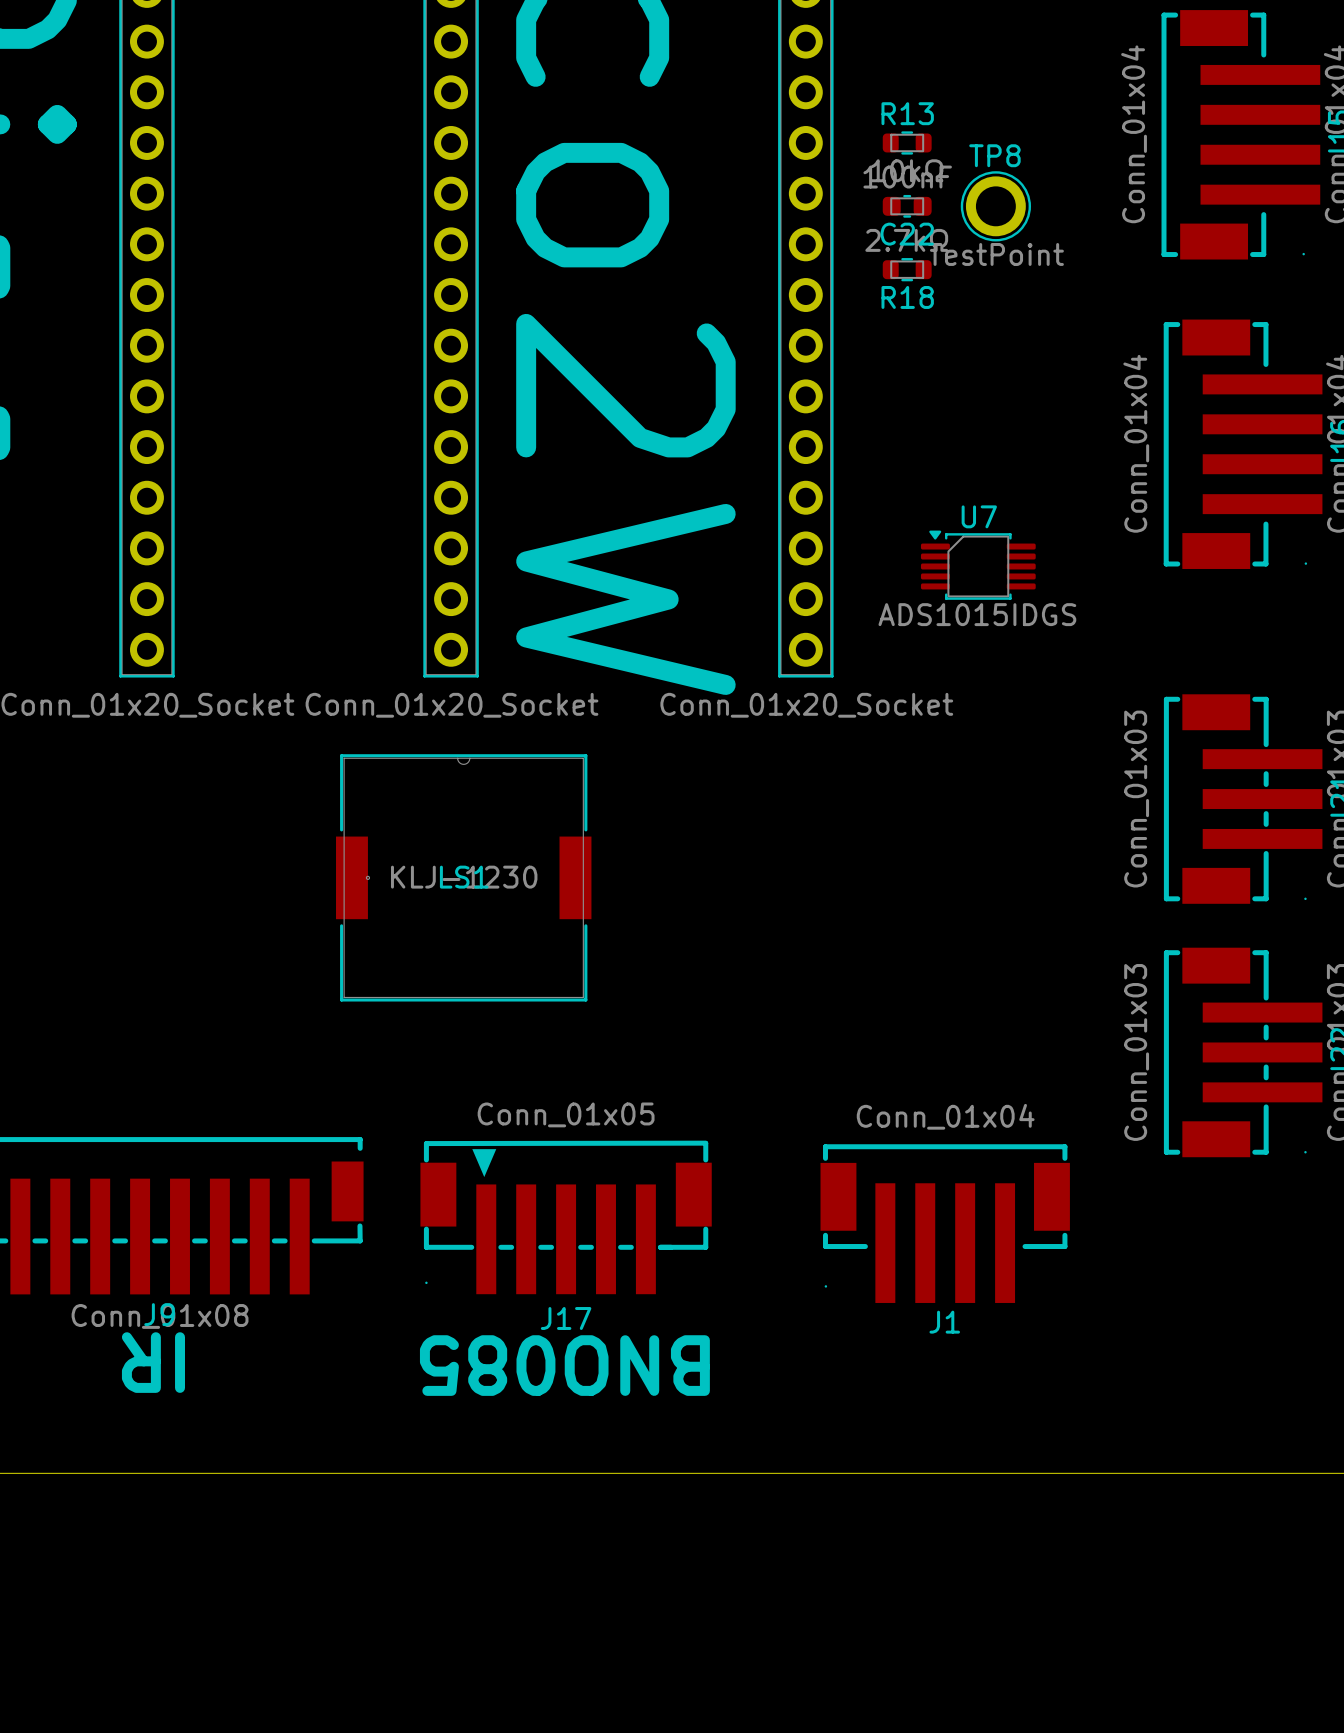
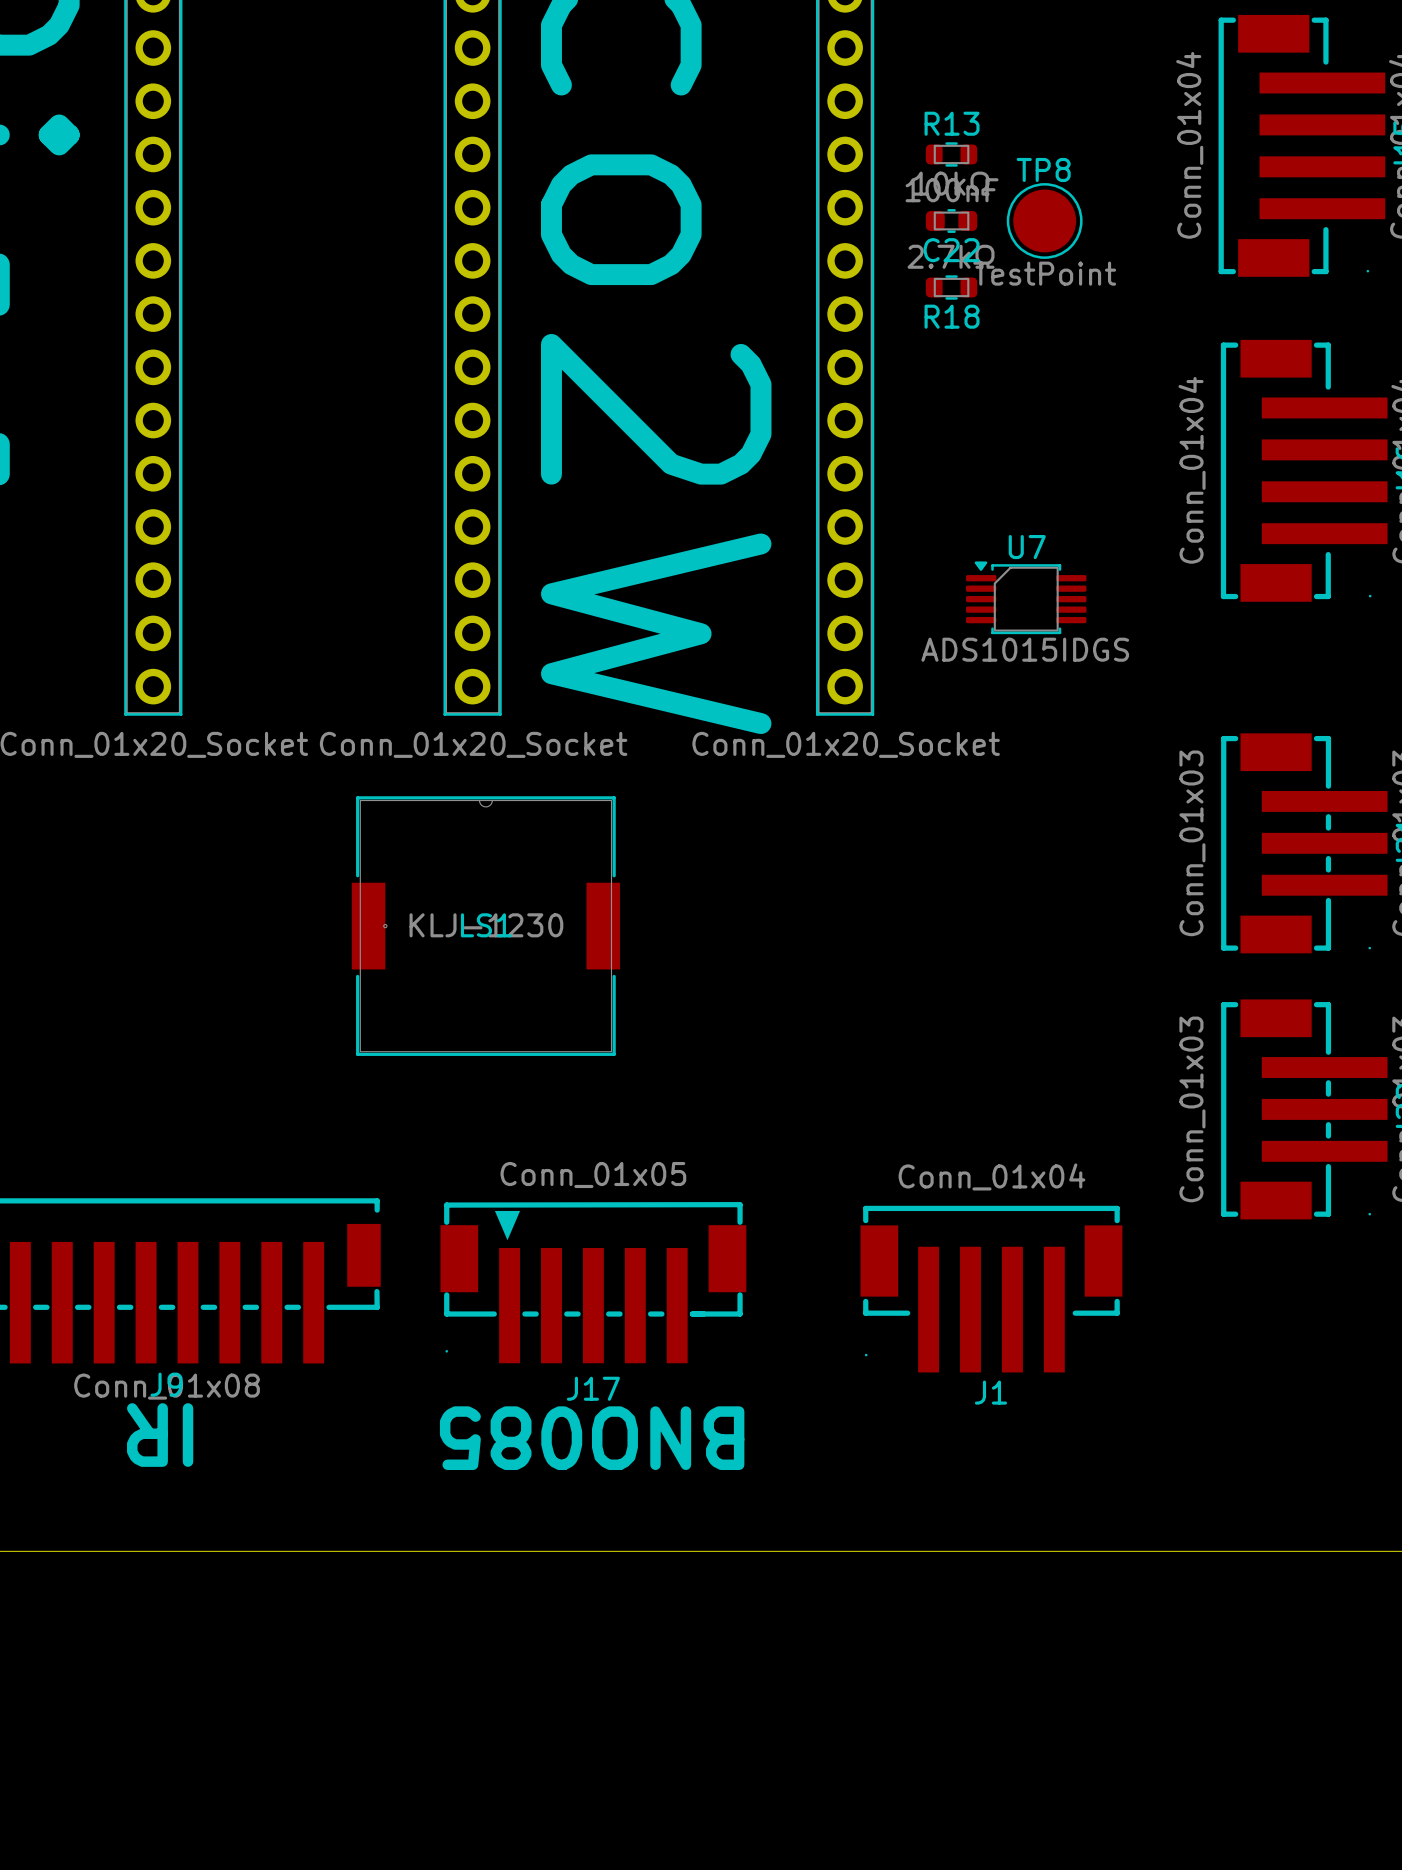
TP8 footprint: [960, 171, 1032, 242] -> [1006, 183, 1083, 259]

